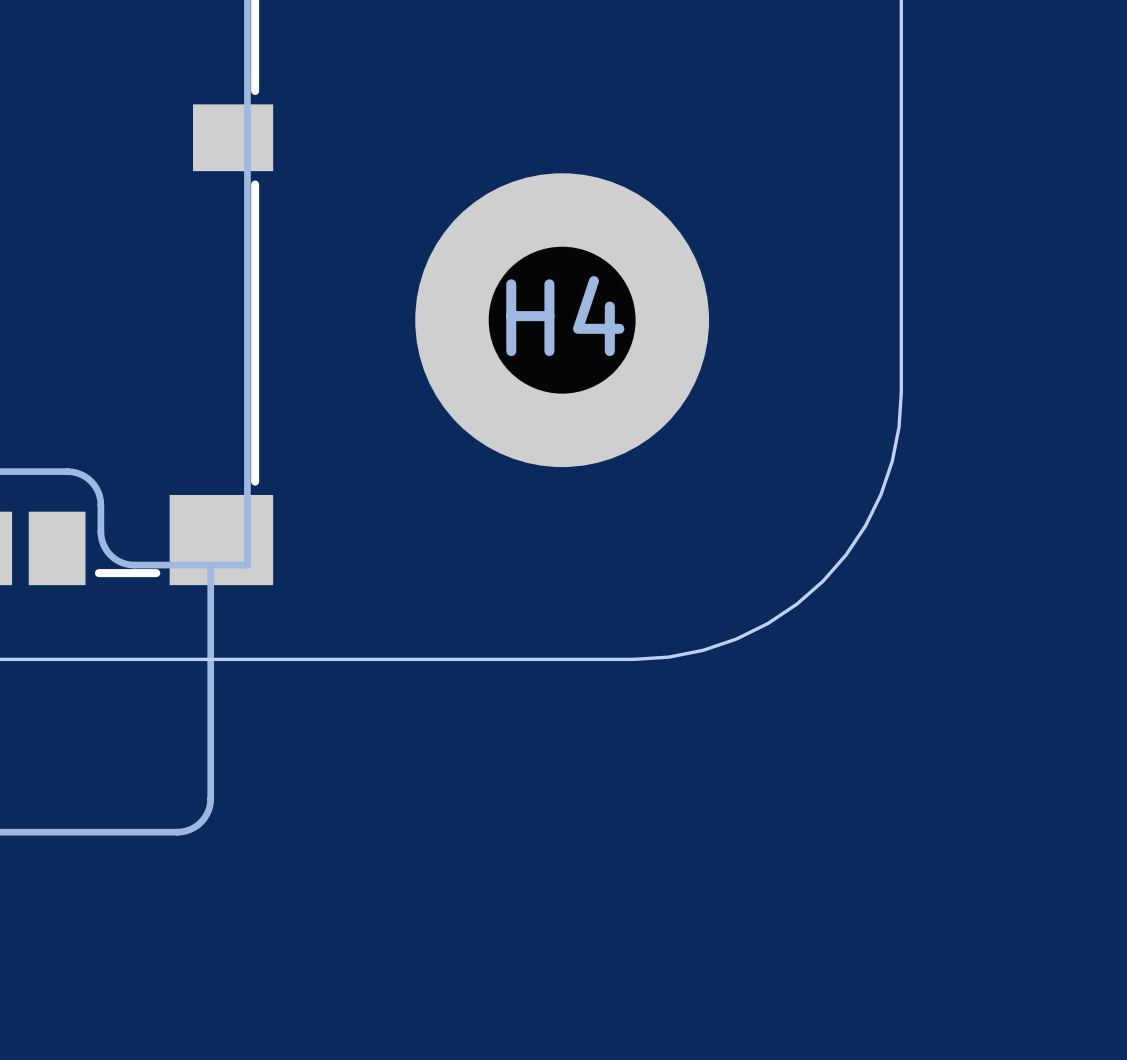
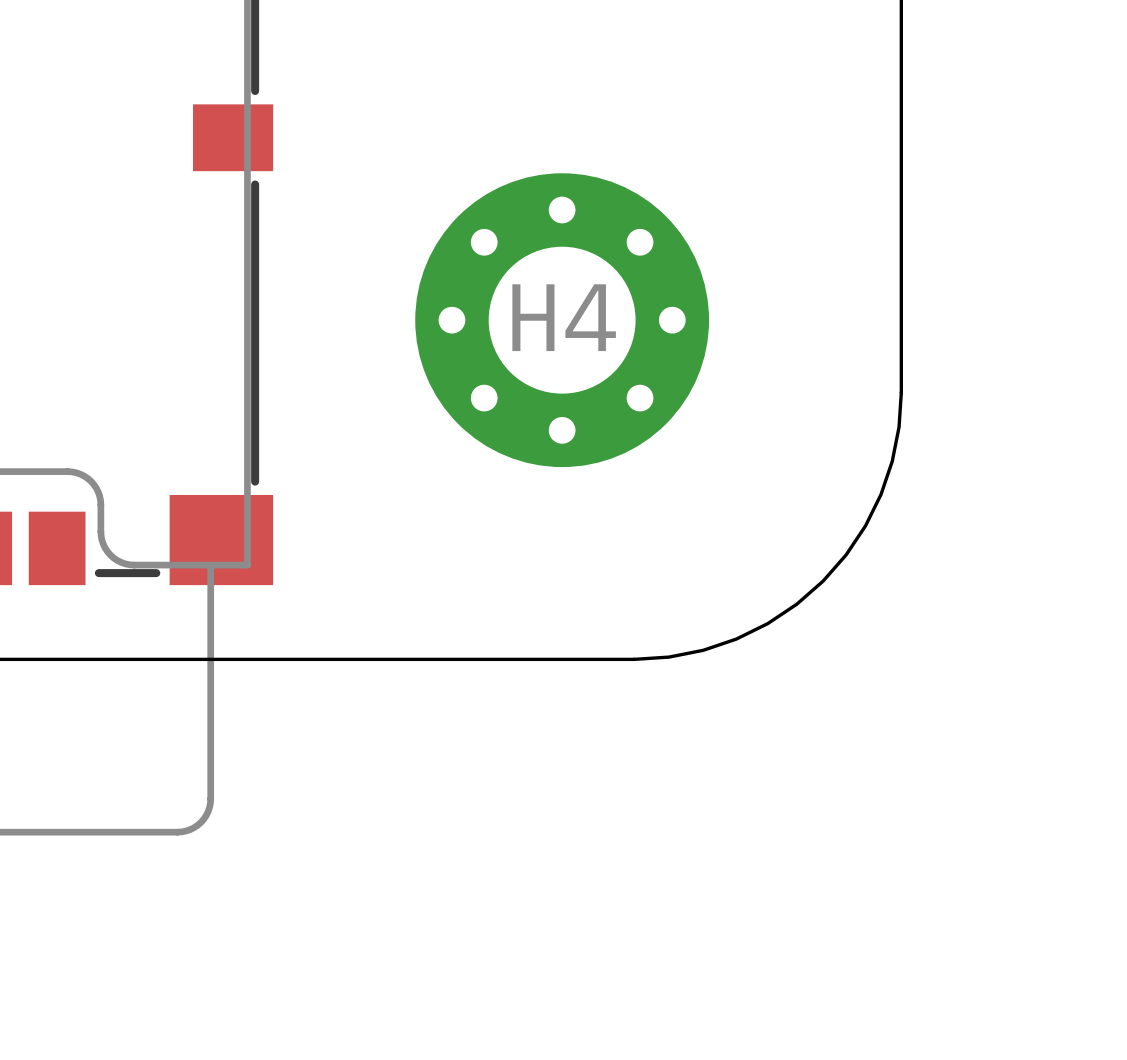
H4 footprint: [415, 173, 710, 468] -> [415, 173, 710, 468]

